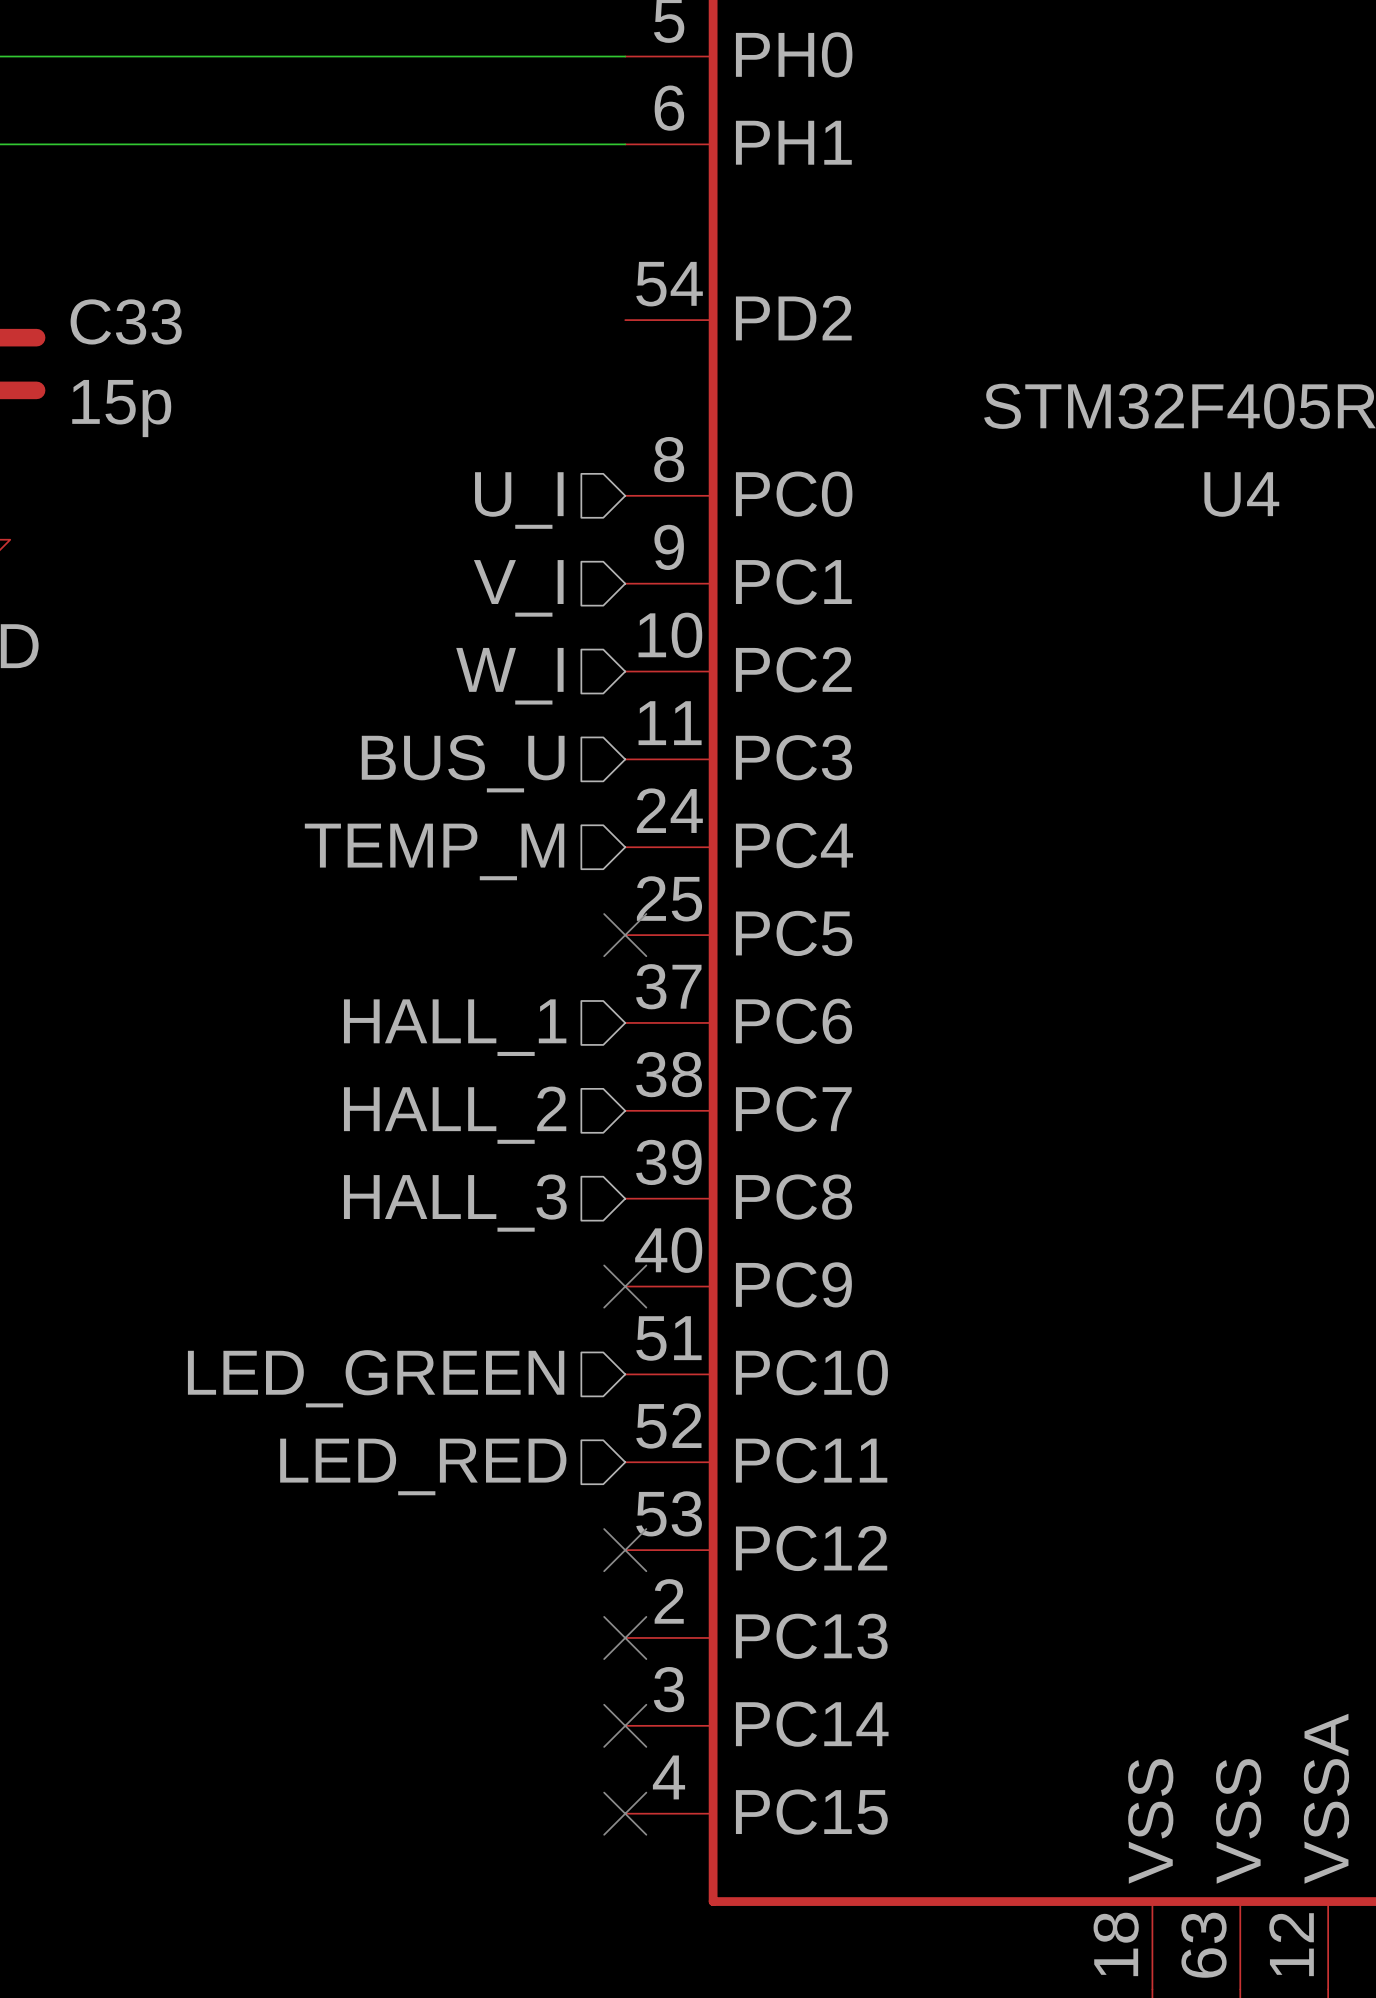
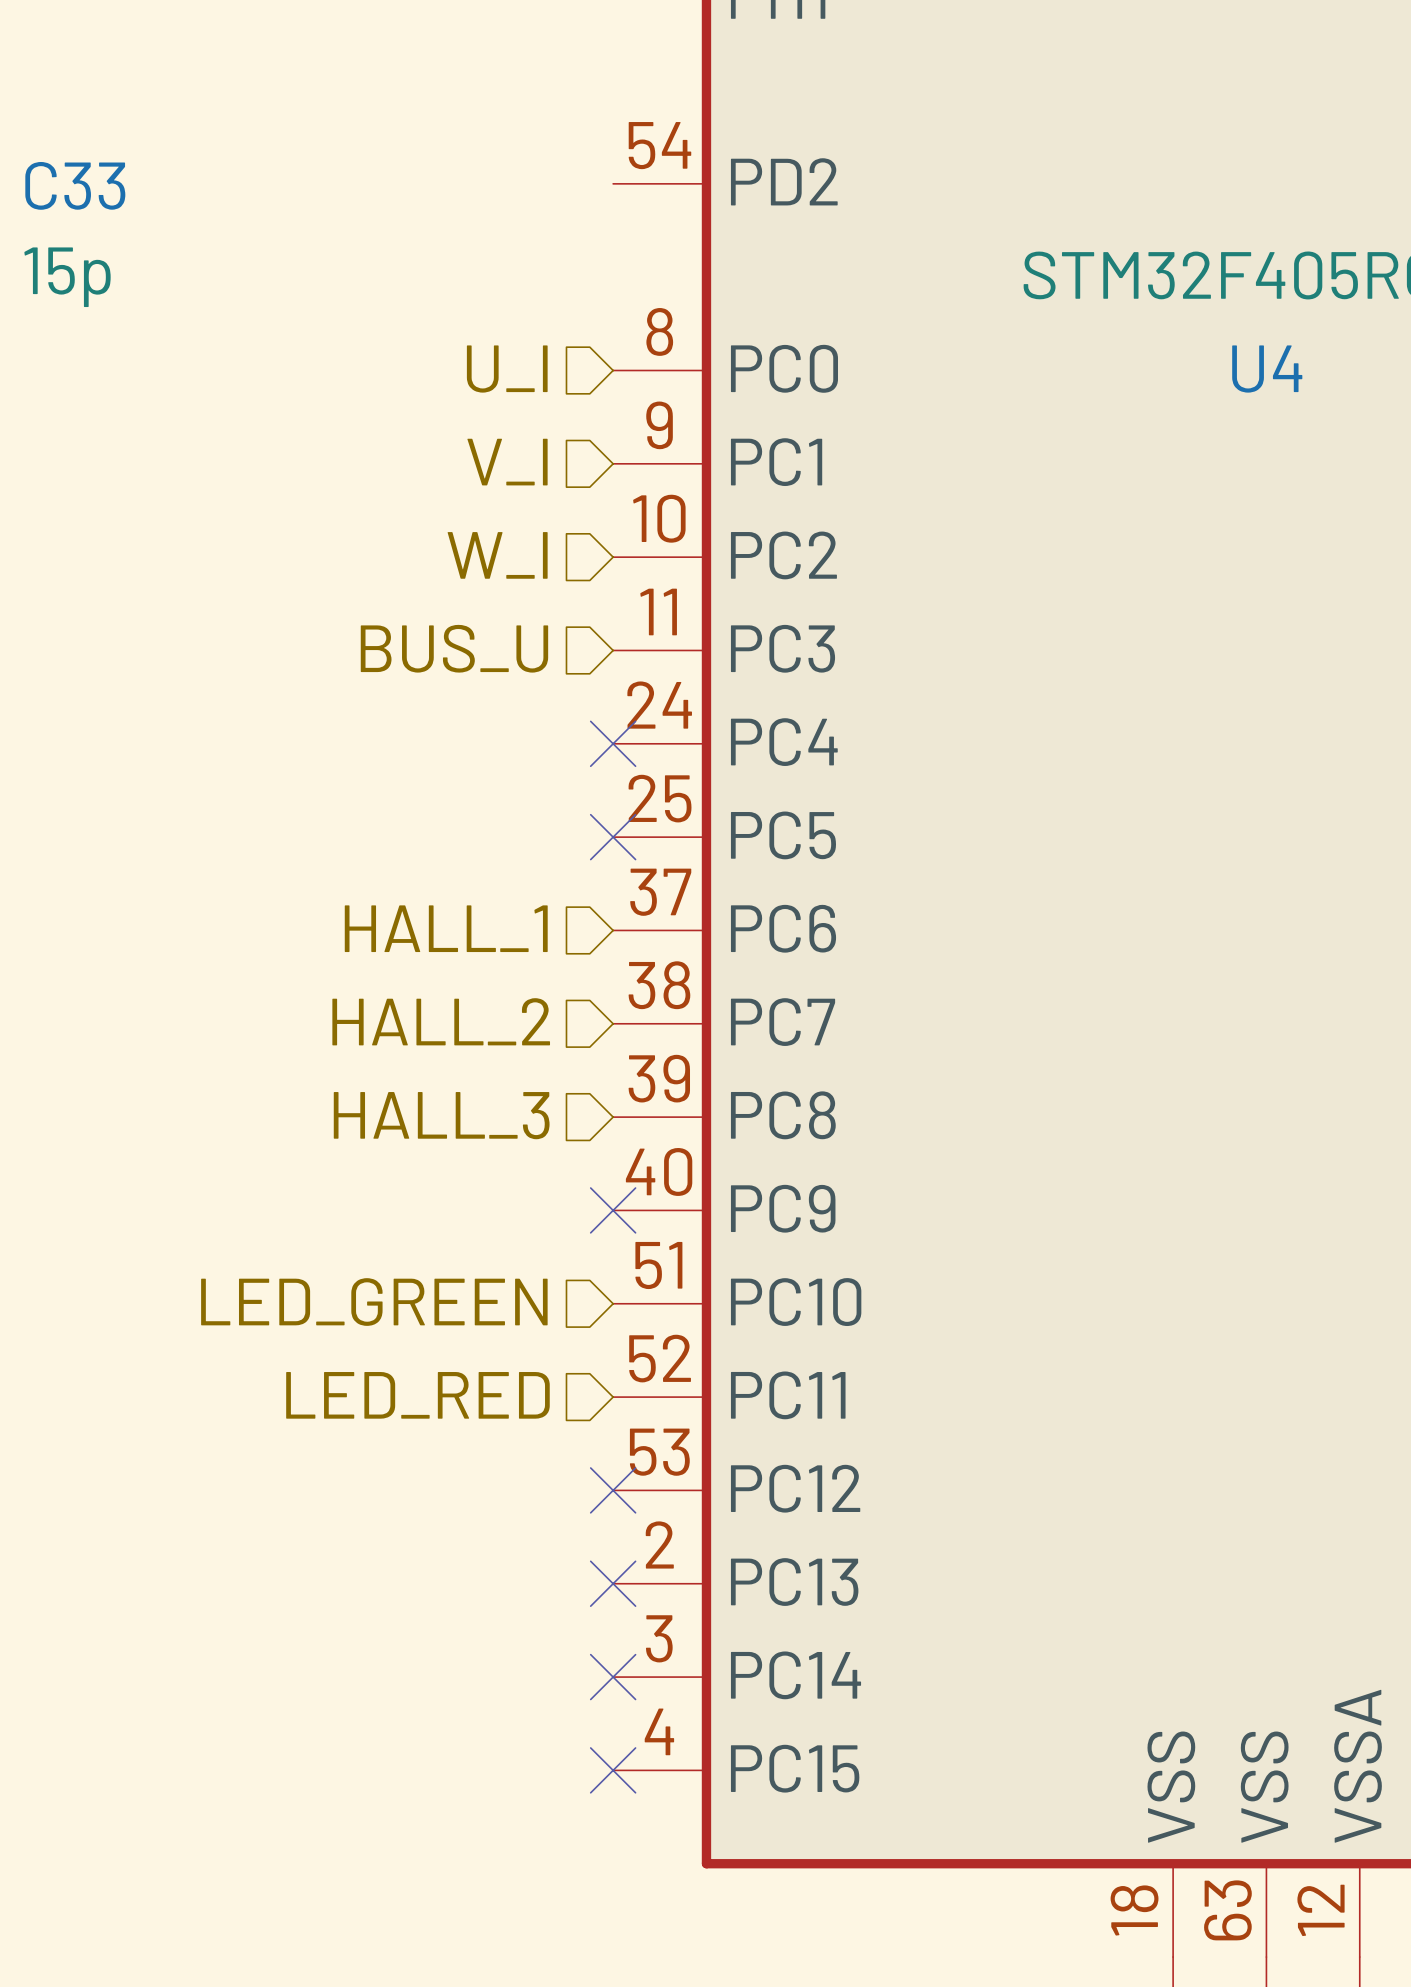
no-connect mark: none -> (613, 743)
hierarchical label: TEMP_M (434, 851) -> none

